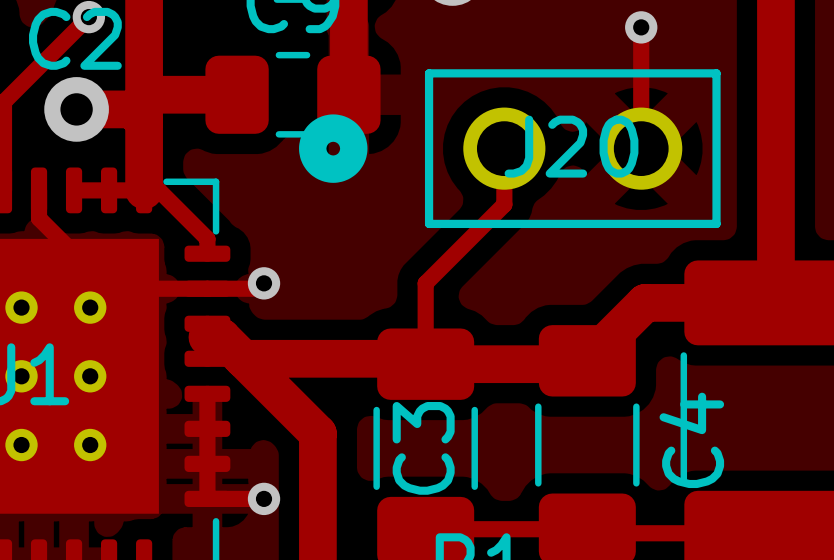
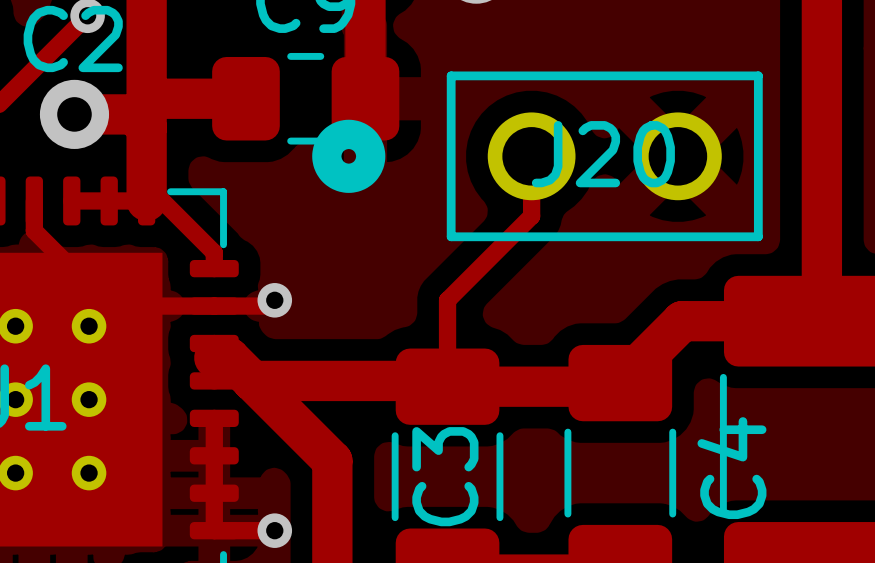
track: (641, 27) (641, 148) -> none
via: (641, 27) -> none

